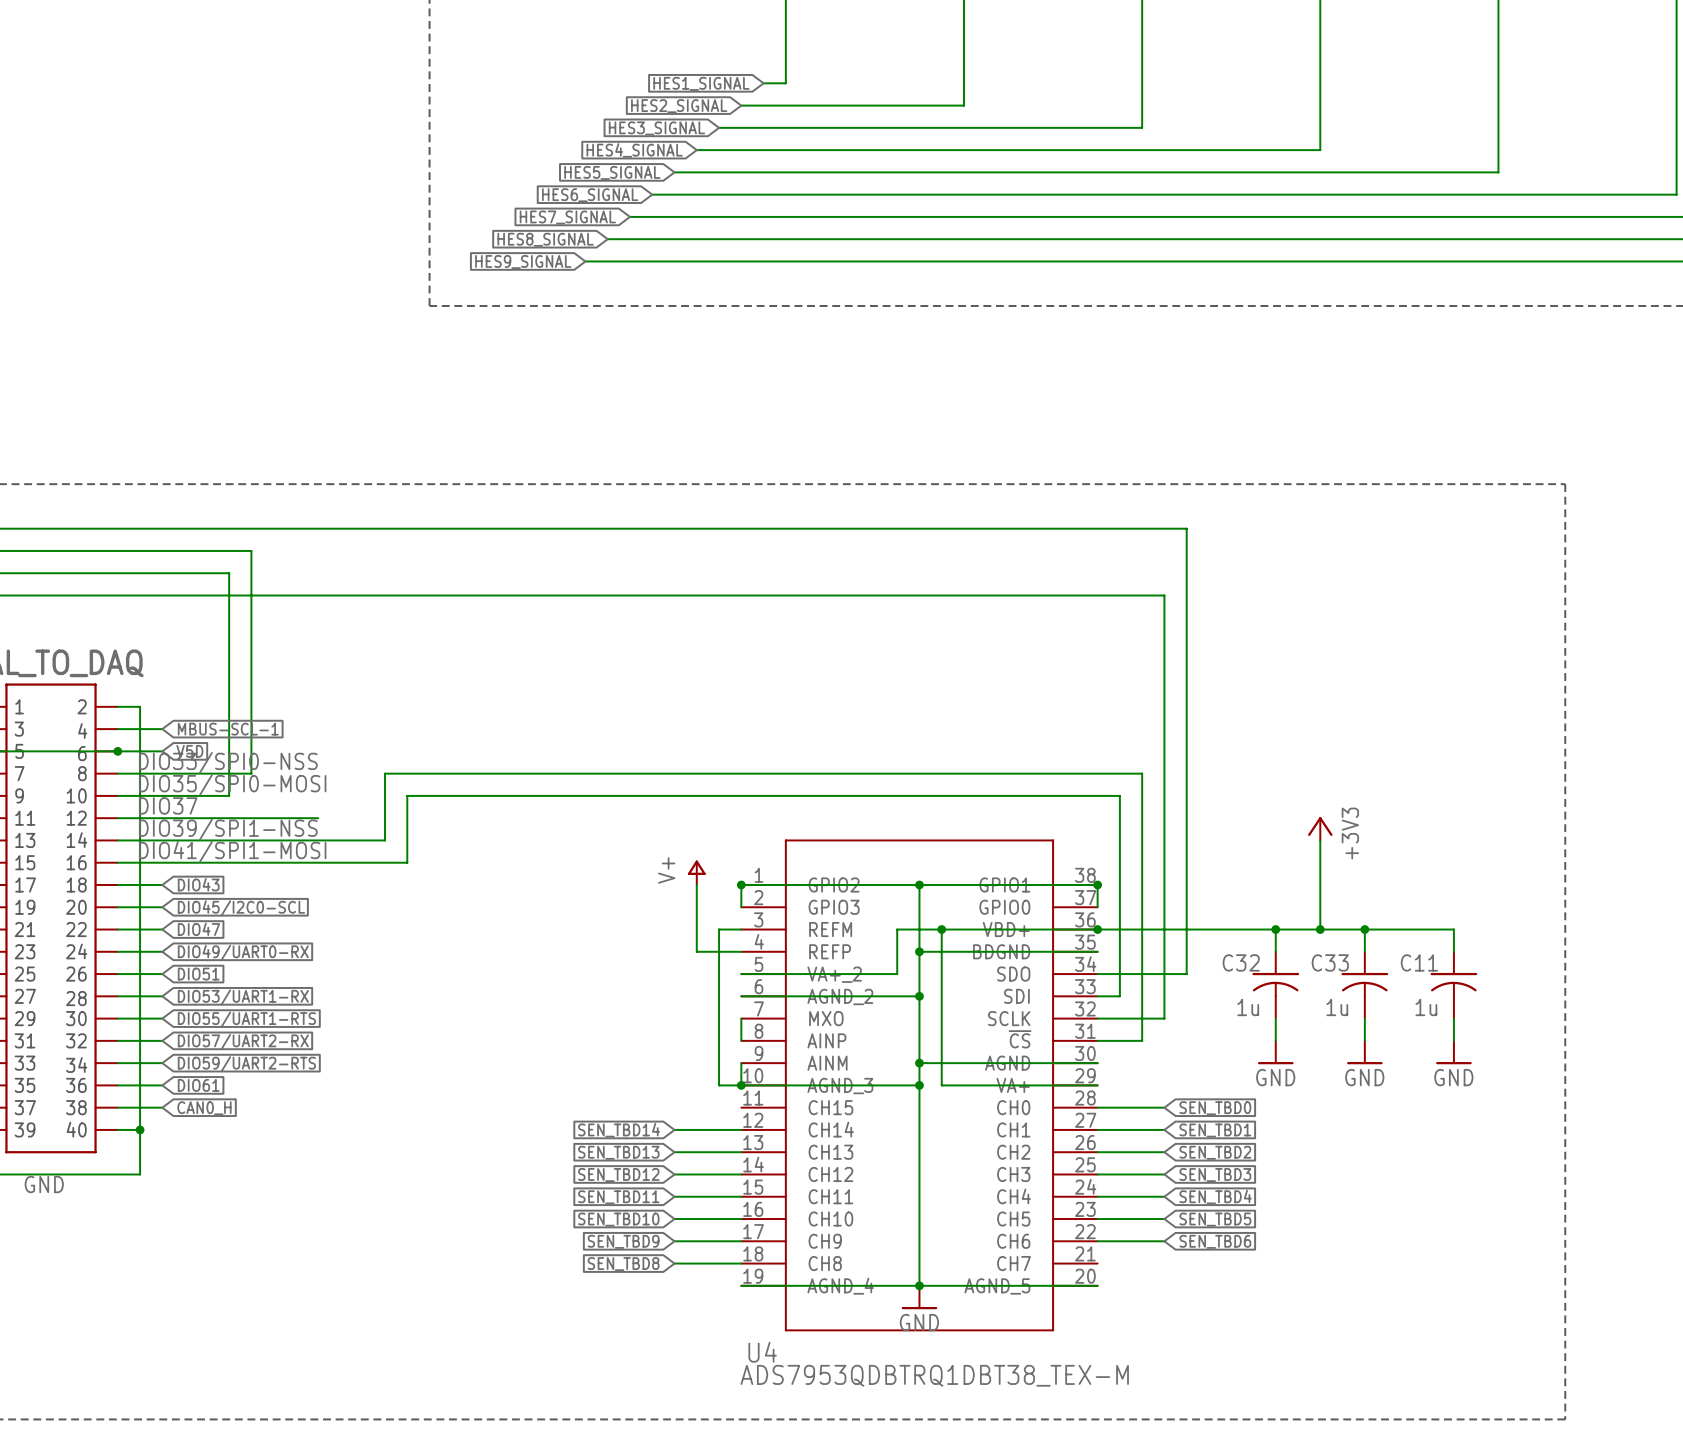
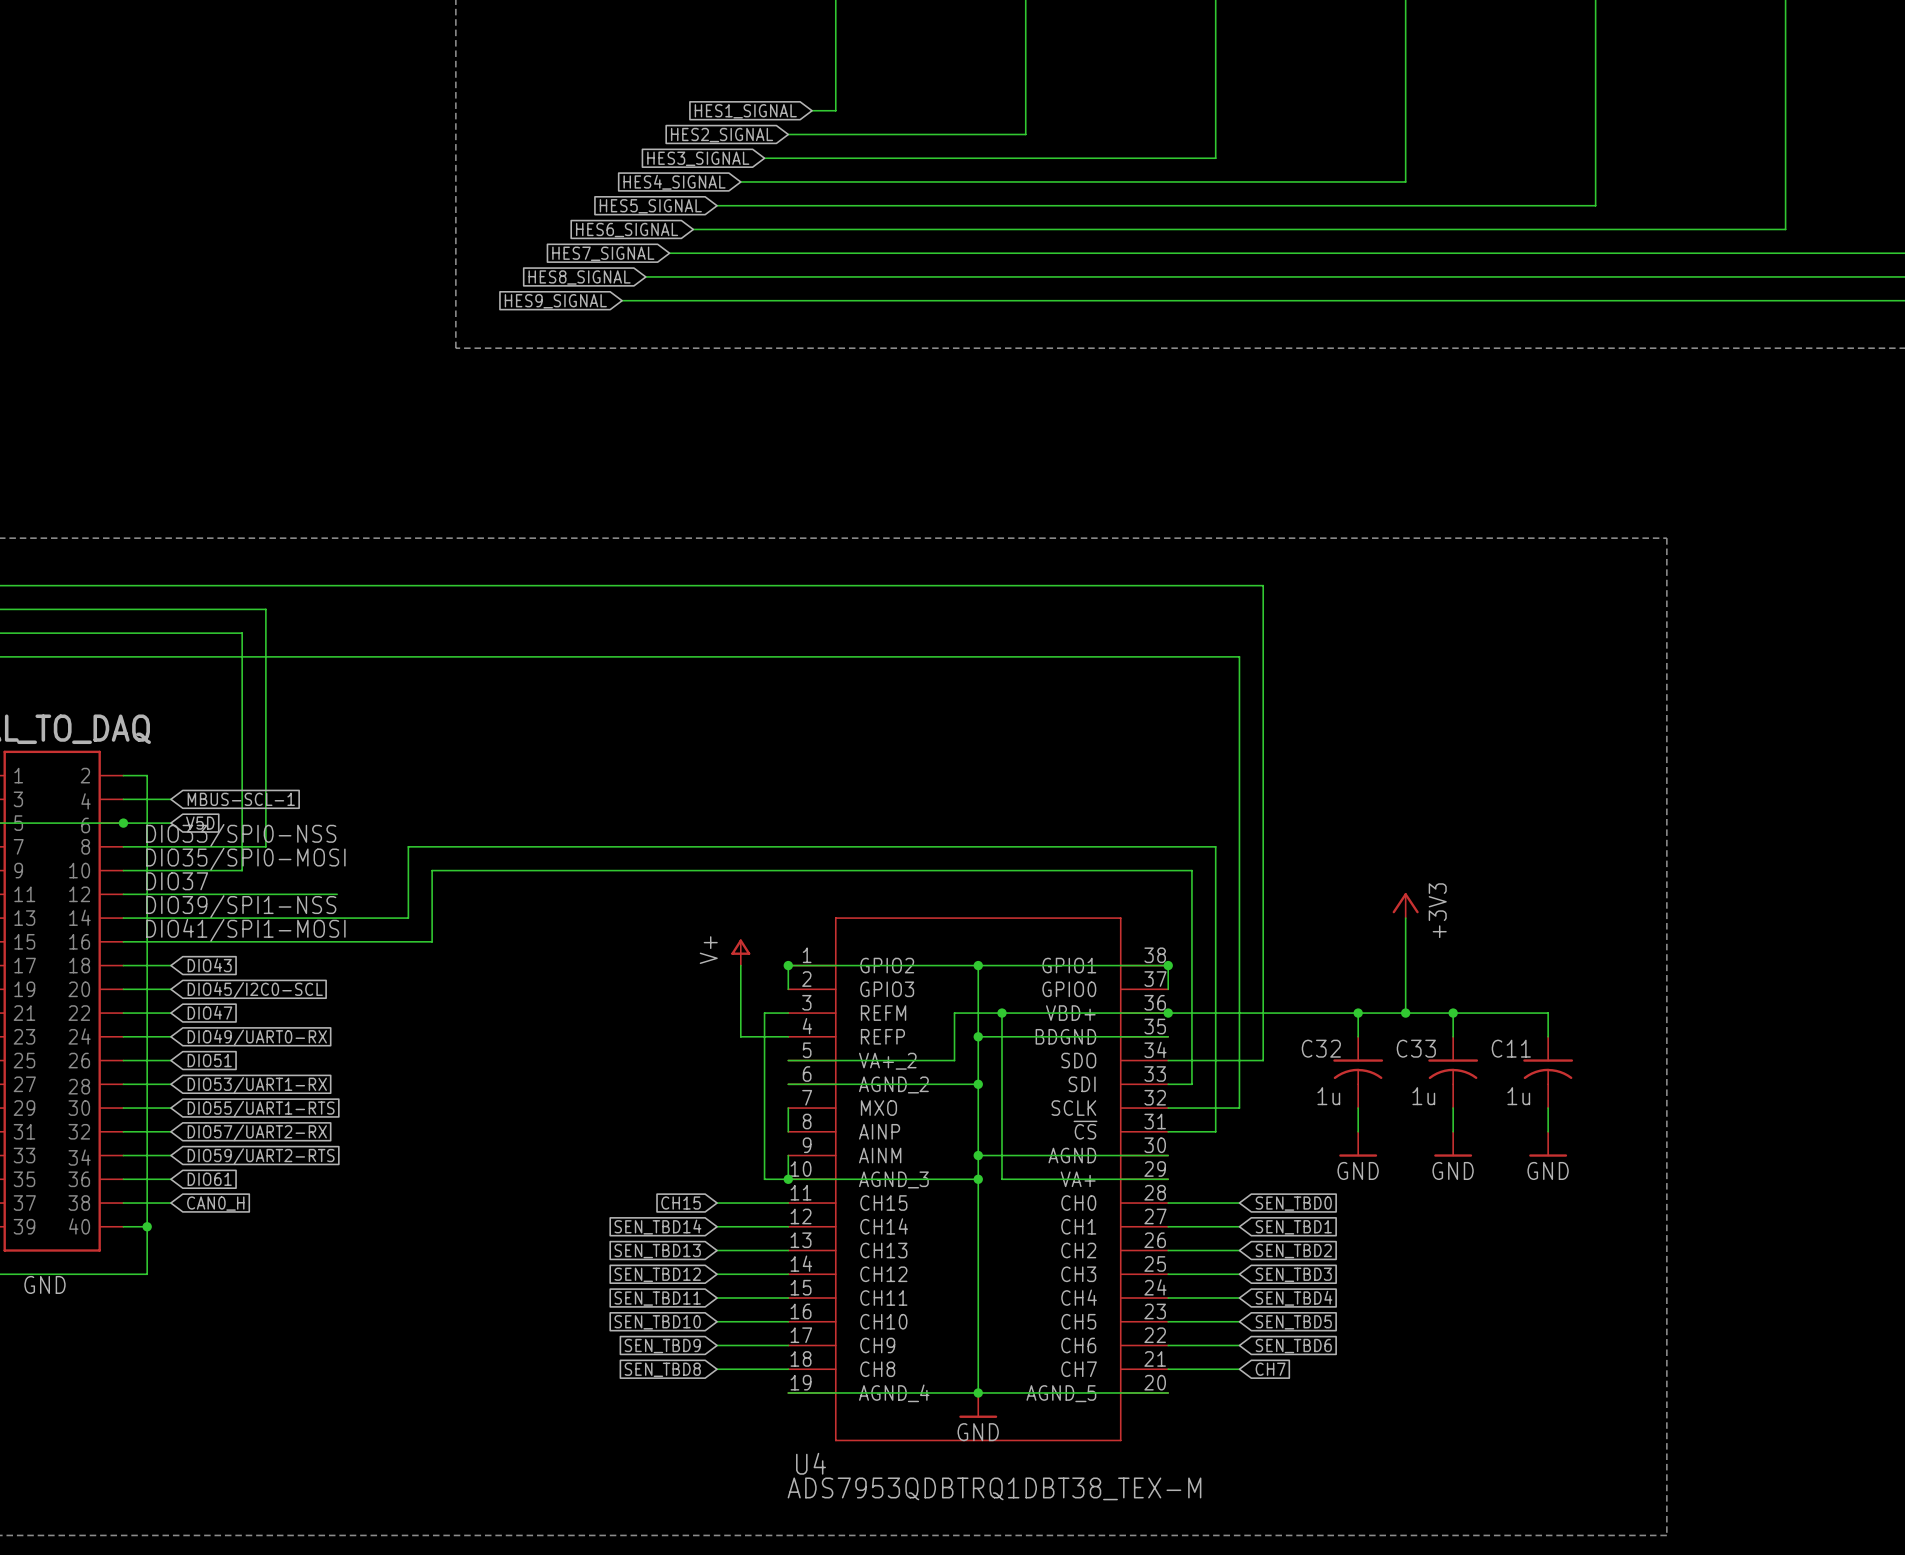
global label: none -> CH15 (681, 1203)
wire: none -> (717, 1203) (788, 1203)
wire: none -> (1168, 1369) (1239, 1369)
global label: none -> CH7 (1270, 1369)

